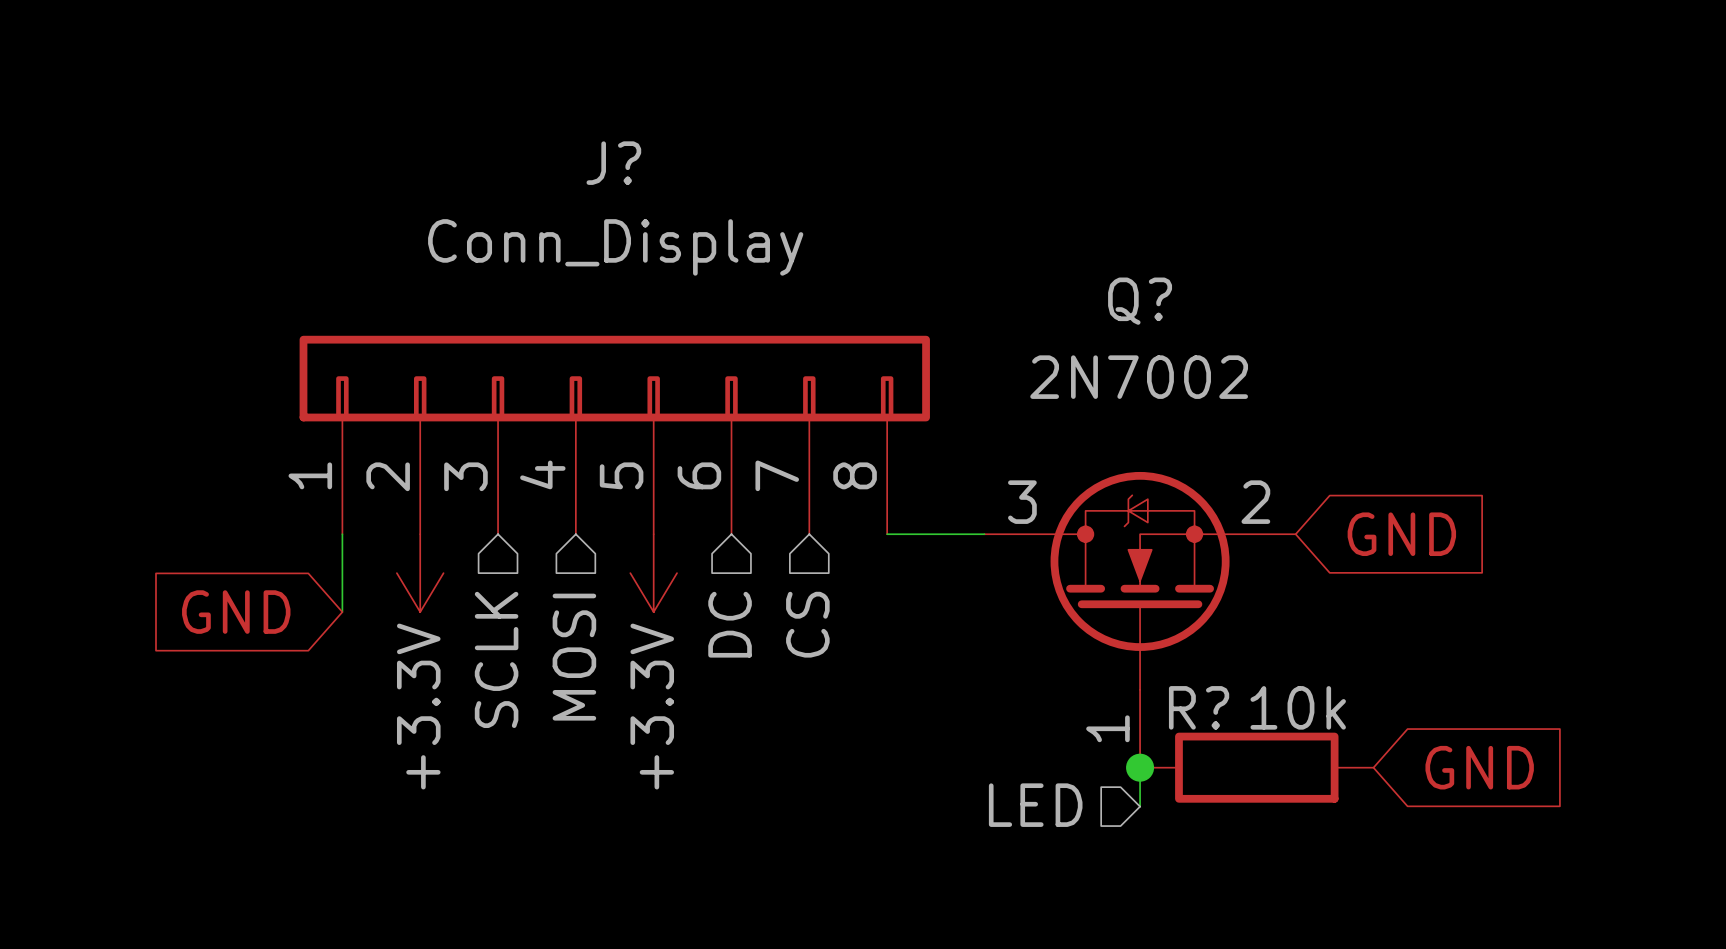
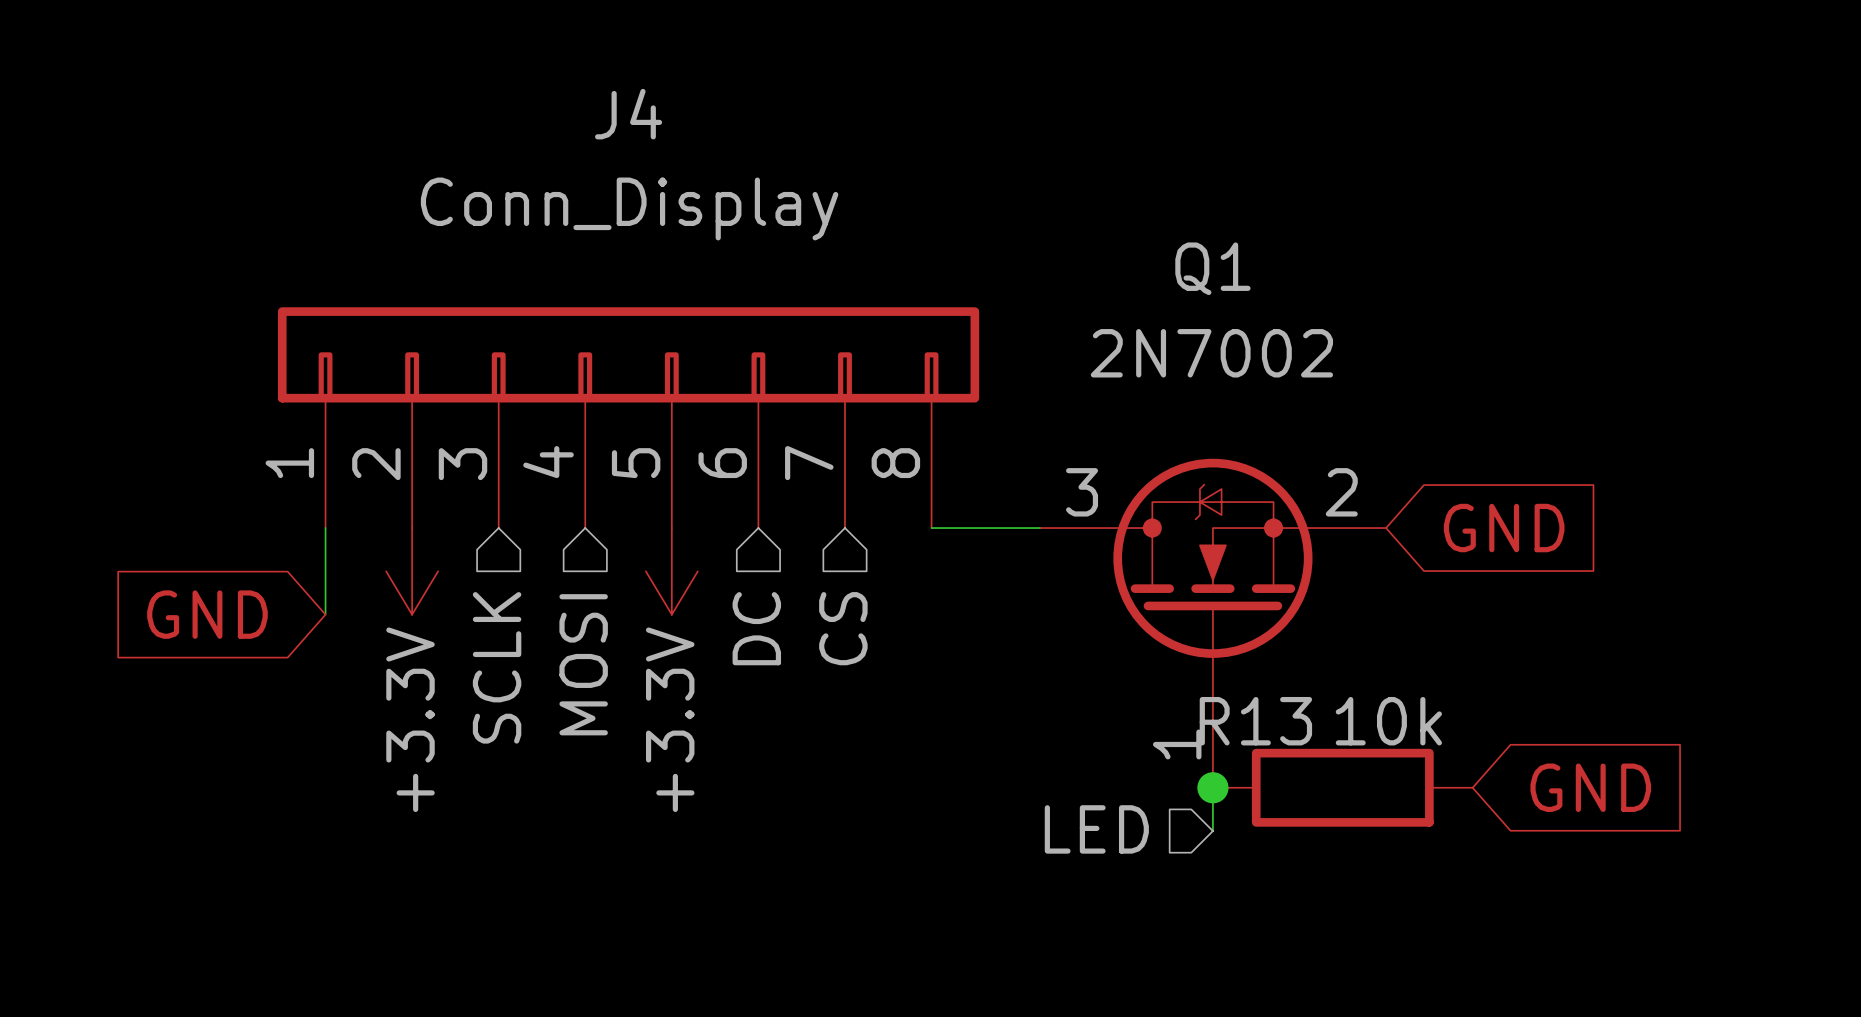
J? name: J? (613, 163) -> J4 (628, 114)
Q? name: Q? (1140, 301) -> Q1 (1212, 268)
R? name: R? (1199, 707) -> R13 (1255, 721)

